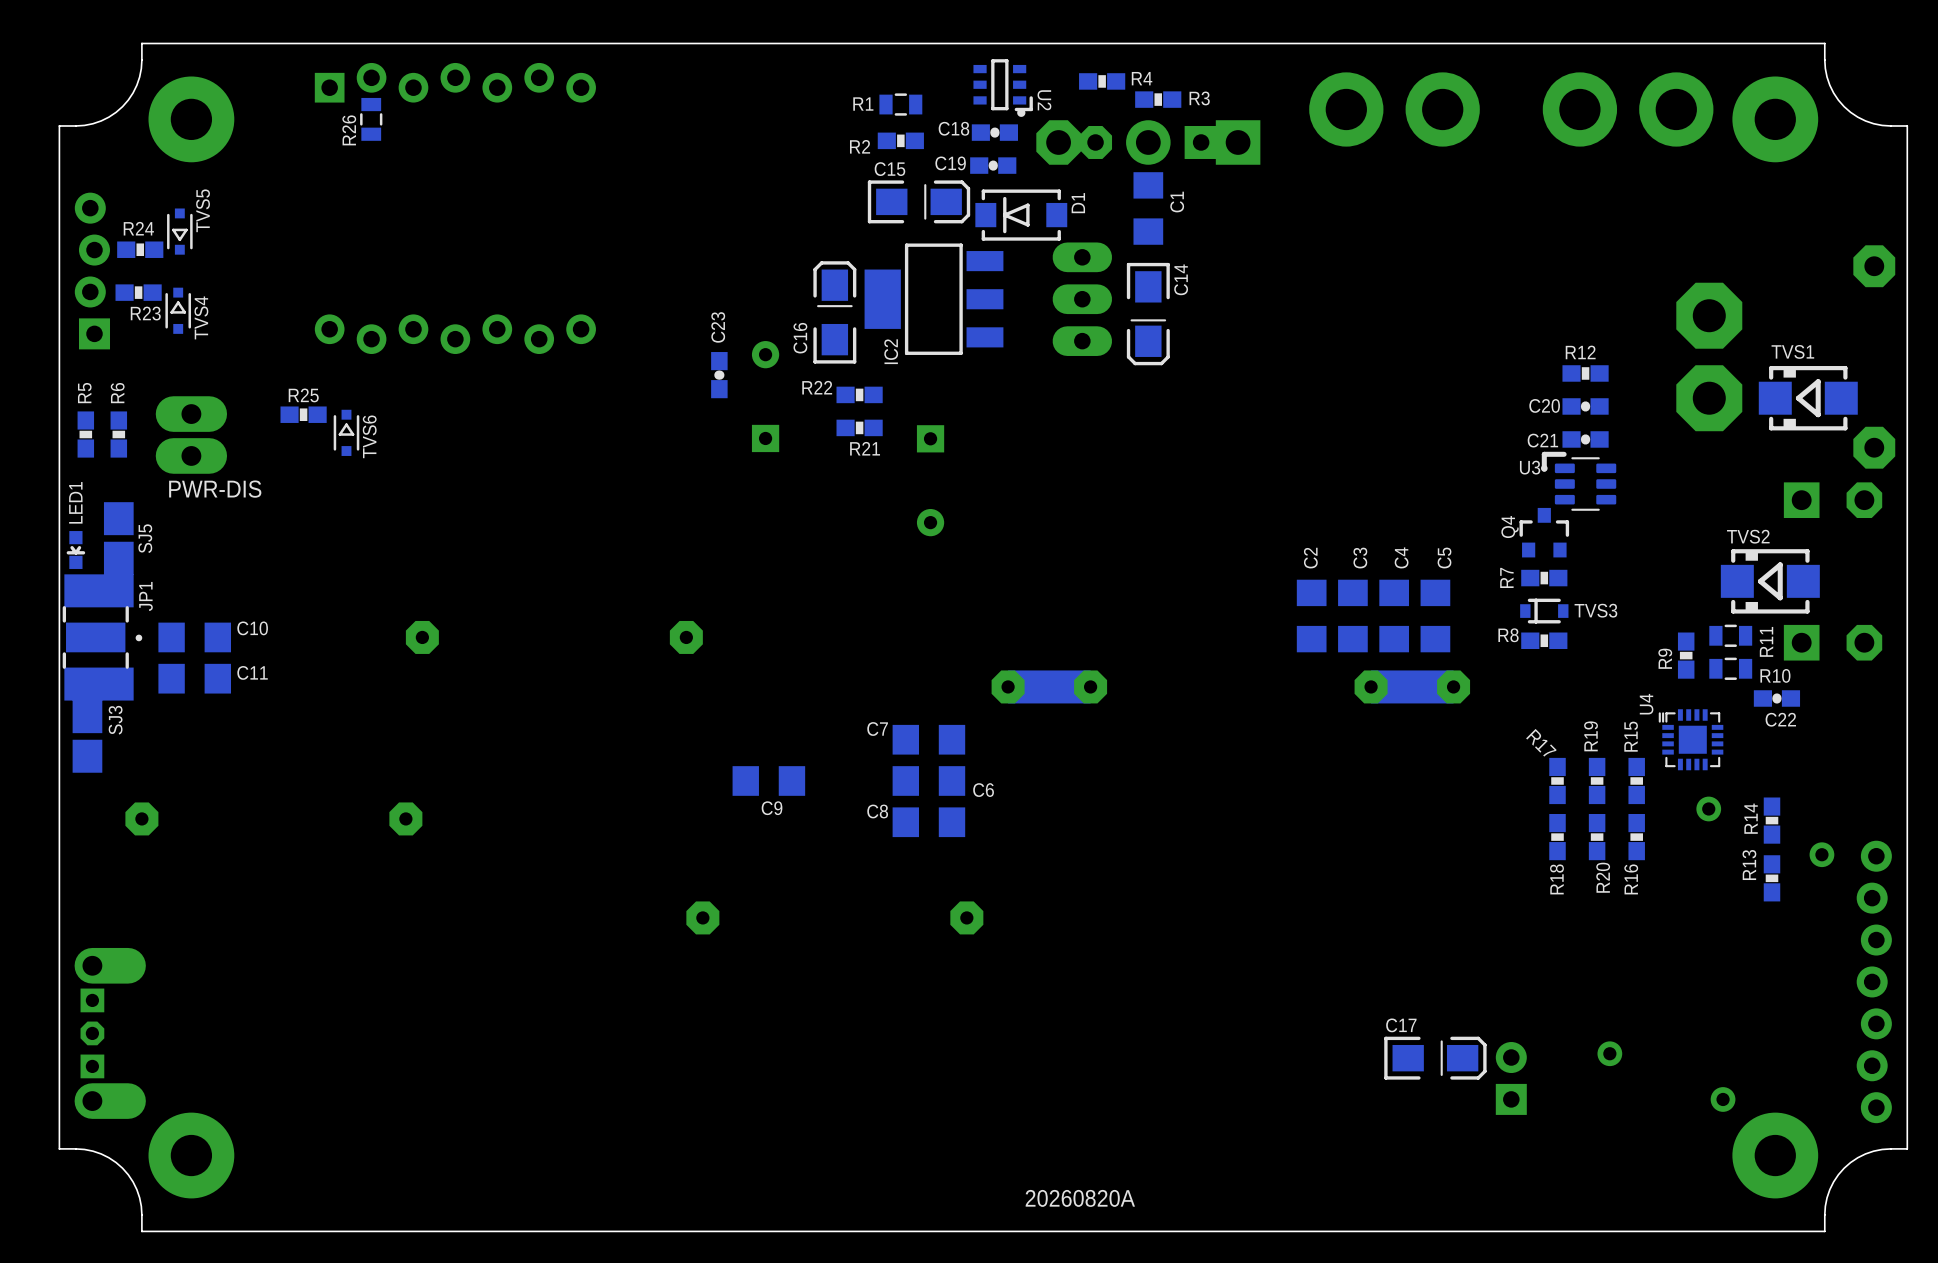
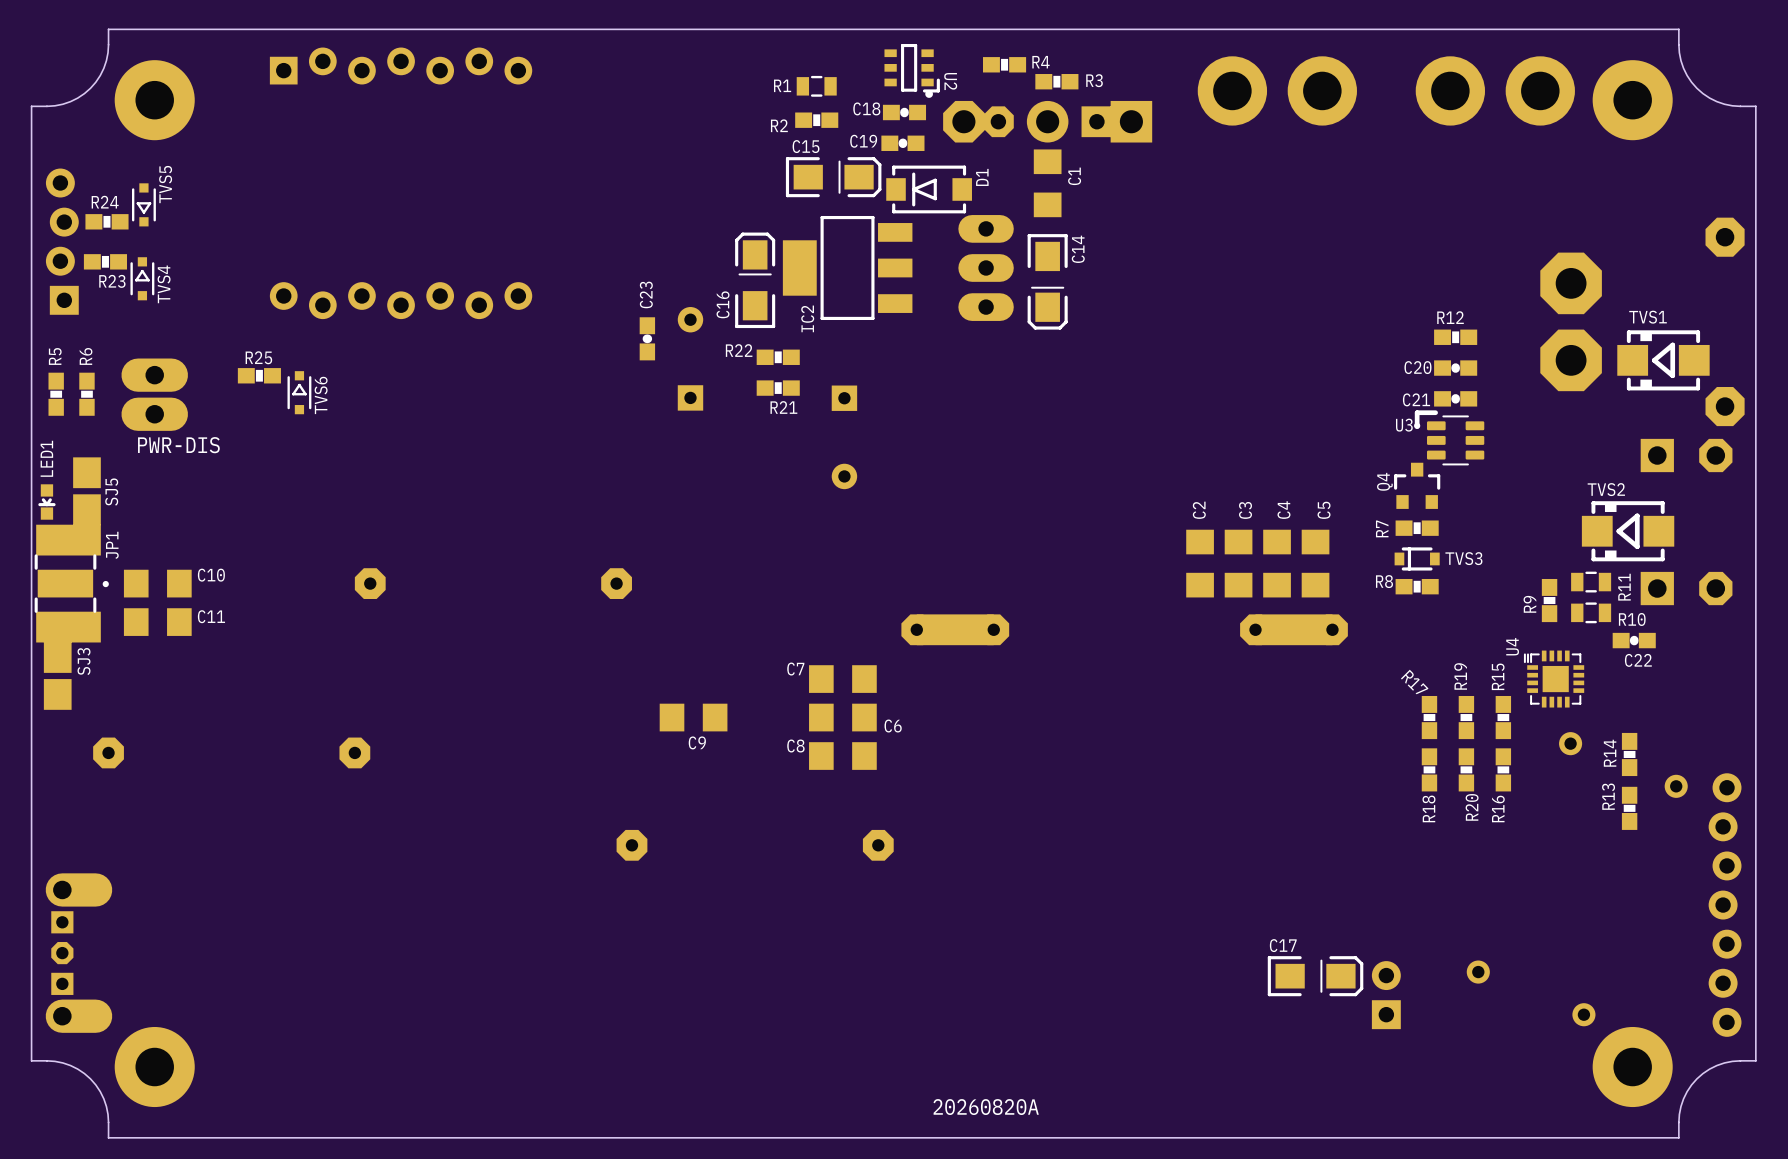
R26: (371, 119) -> none

